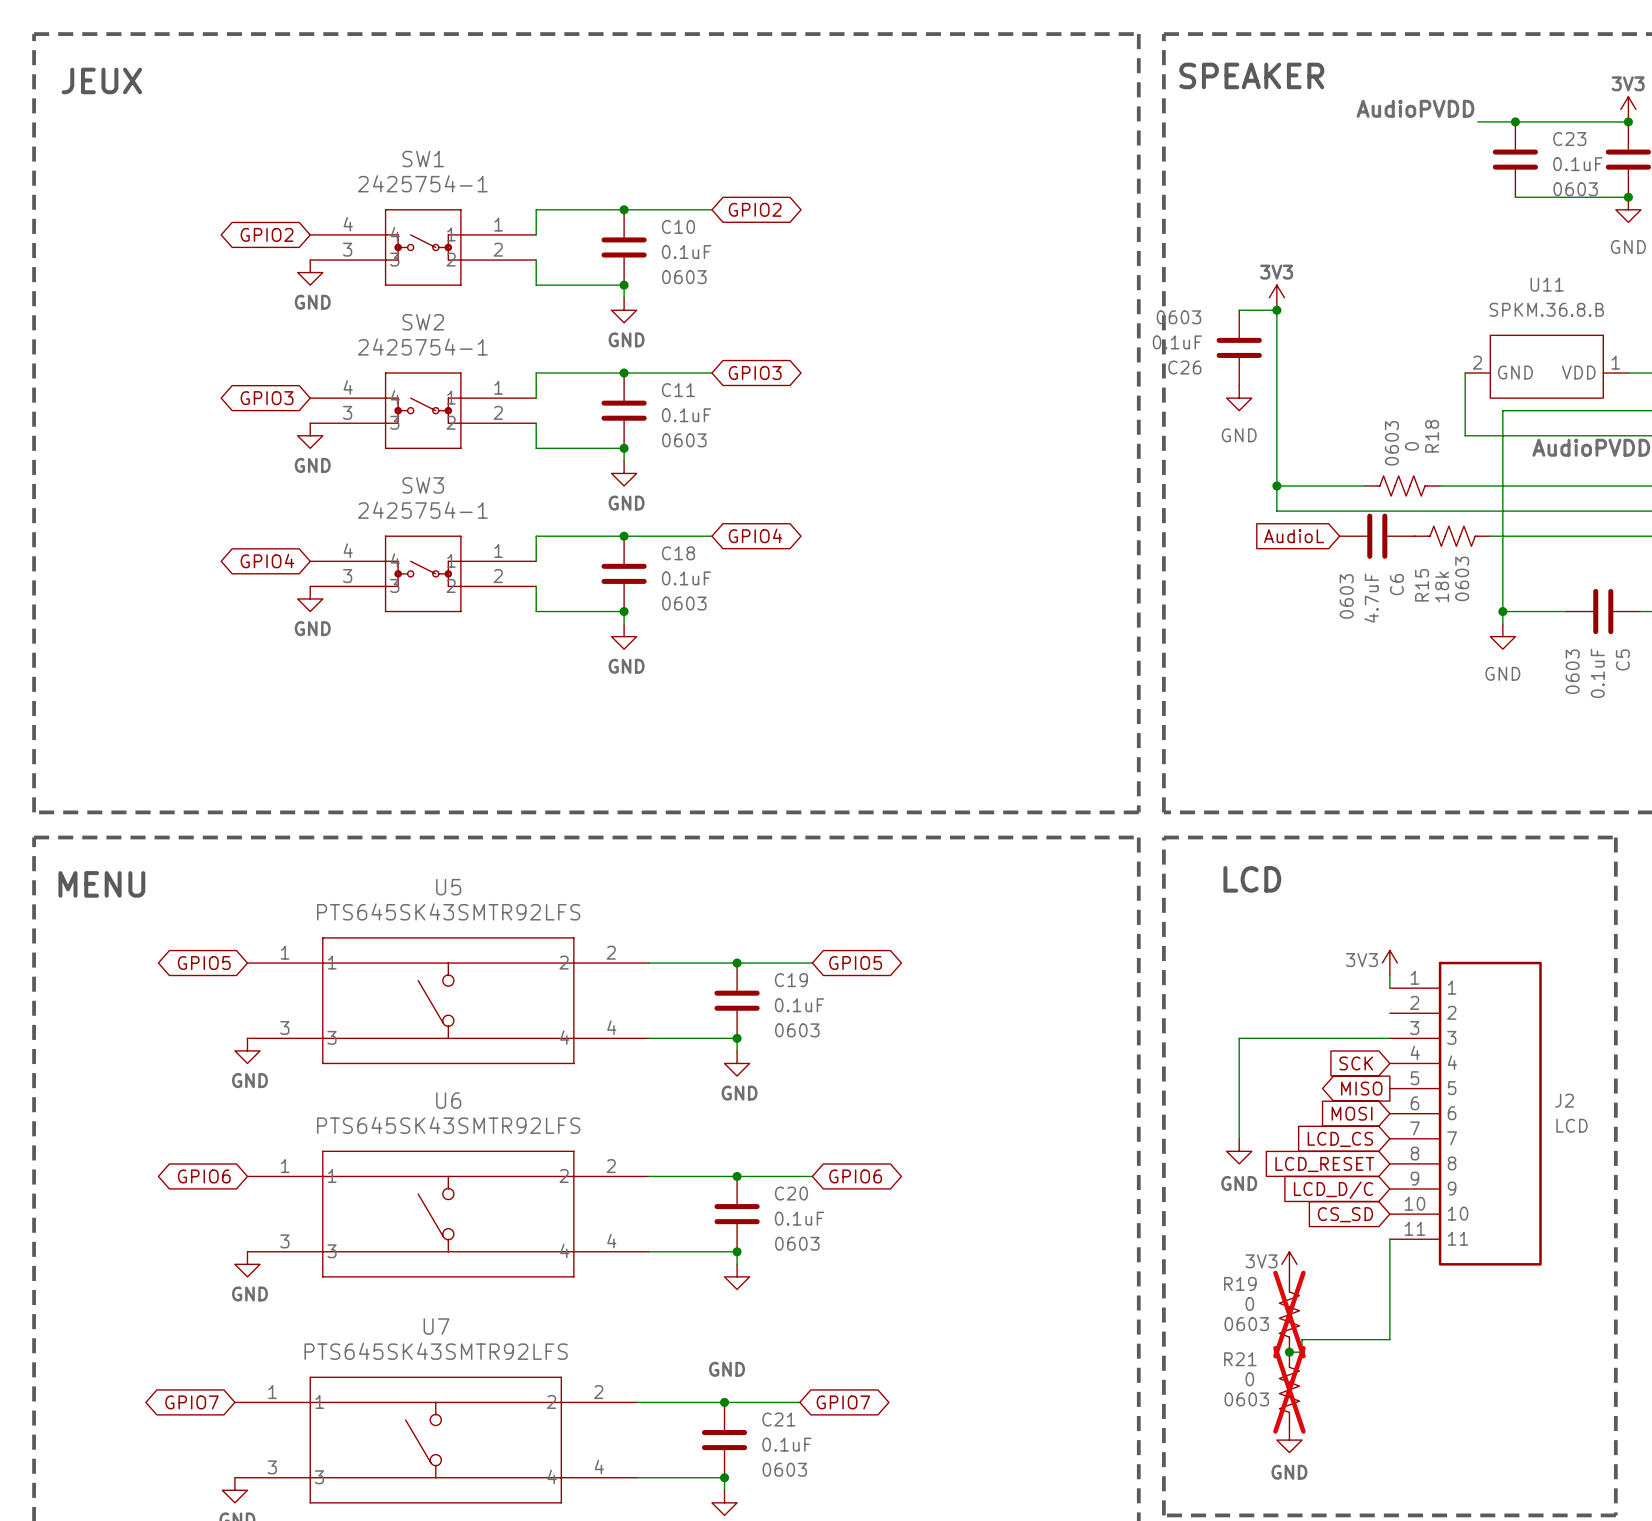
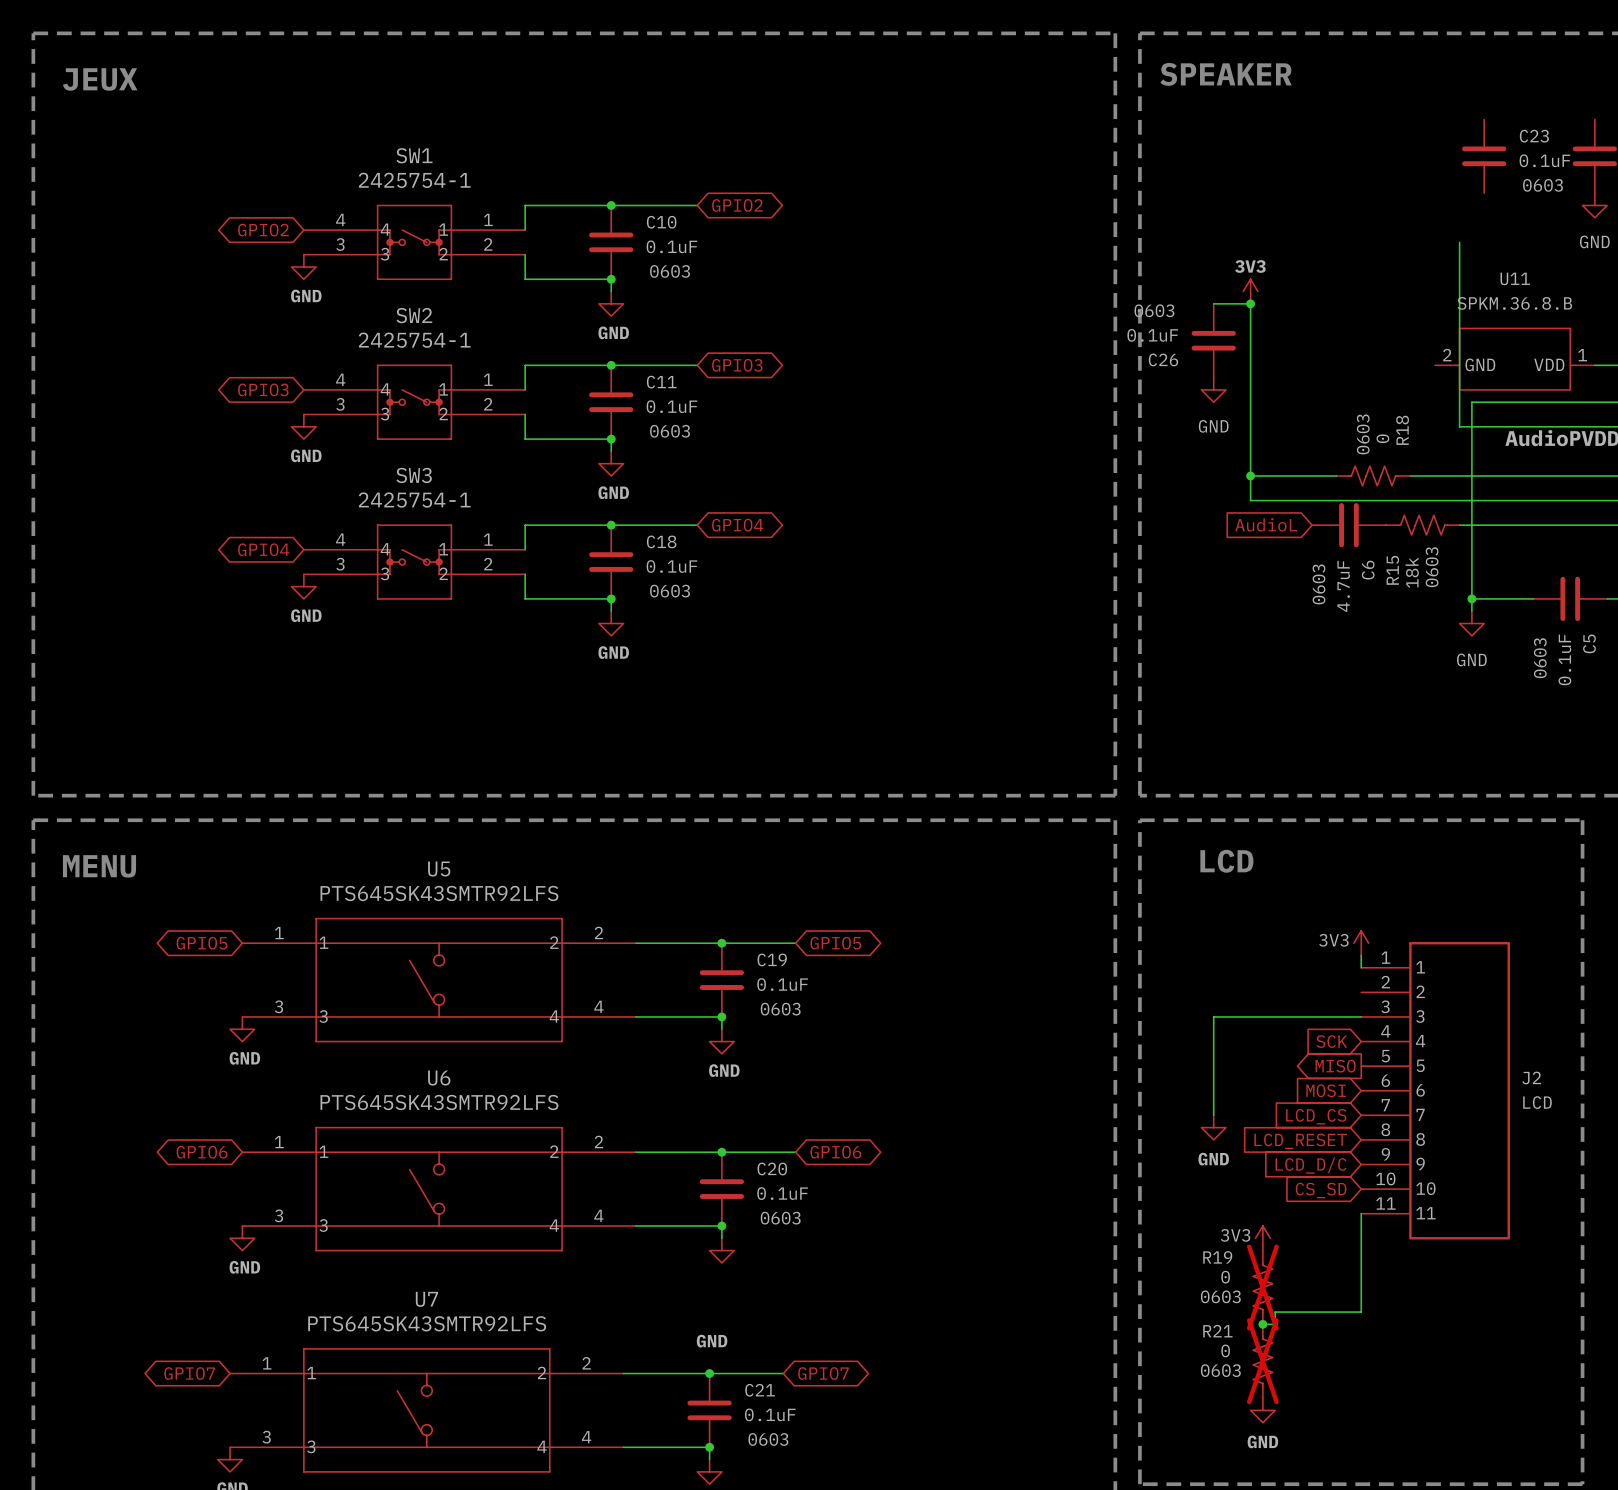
label: AudioPVDD (1415, 108) -> none
power symbol: 3V3 (1628, 109) -> none
wire: (1477, 121) (1628, 121) -> none
junction: (1515, 121) -> none
junction: (1628, 121) -> none
wire: (1515, 197) (1628, 197) -> none
junction: (1628, 197) -> none
wire: (1465, 373) (1465, 435) (1490, 435) -> (1459, 242) (1459, 426)

